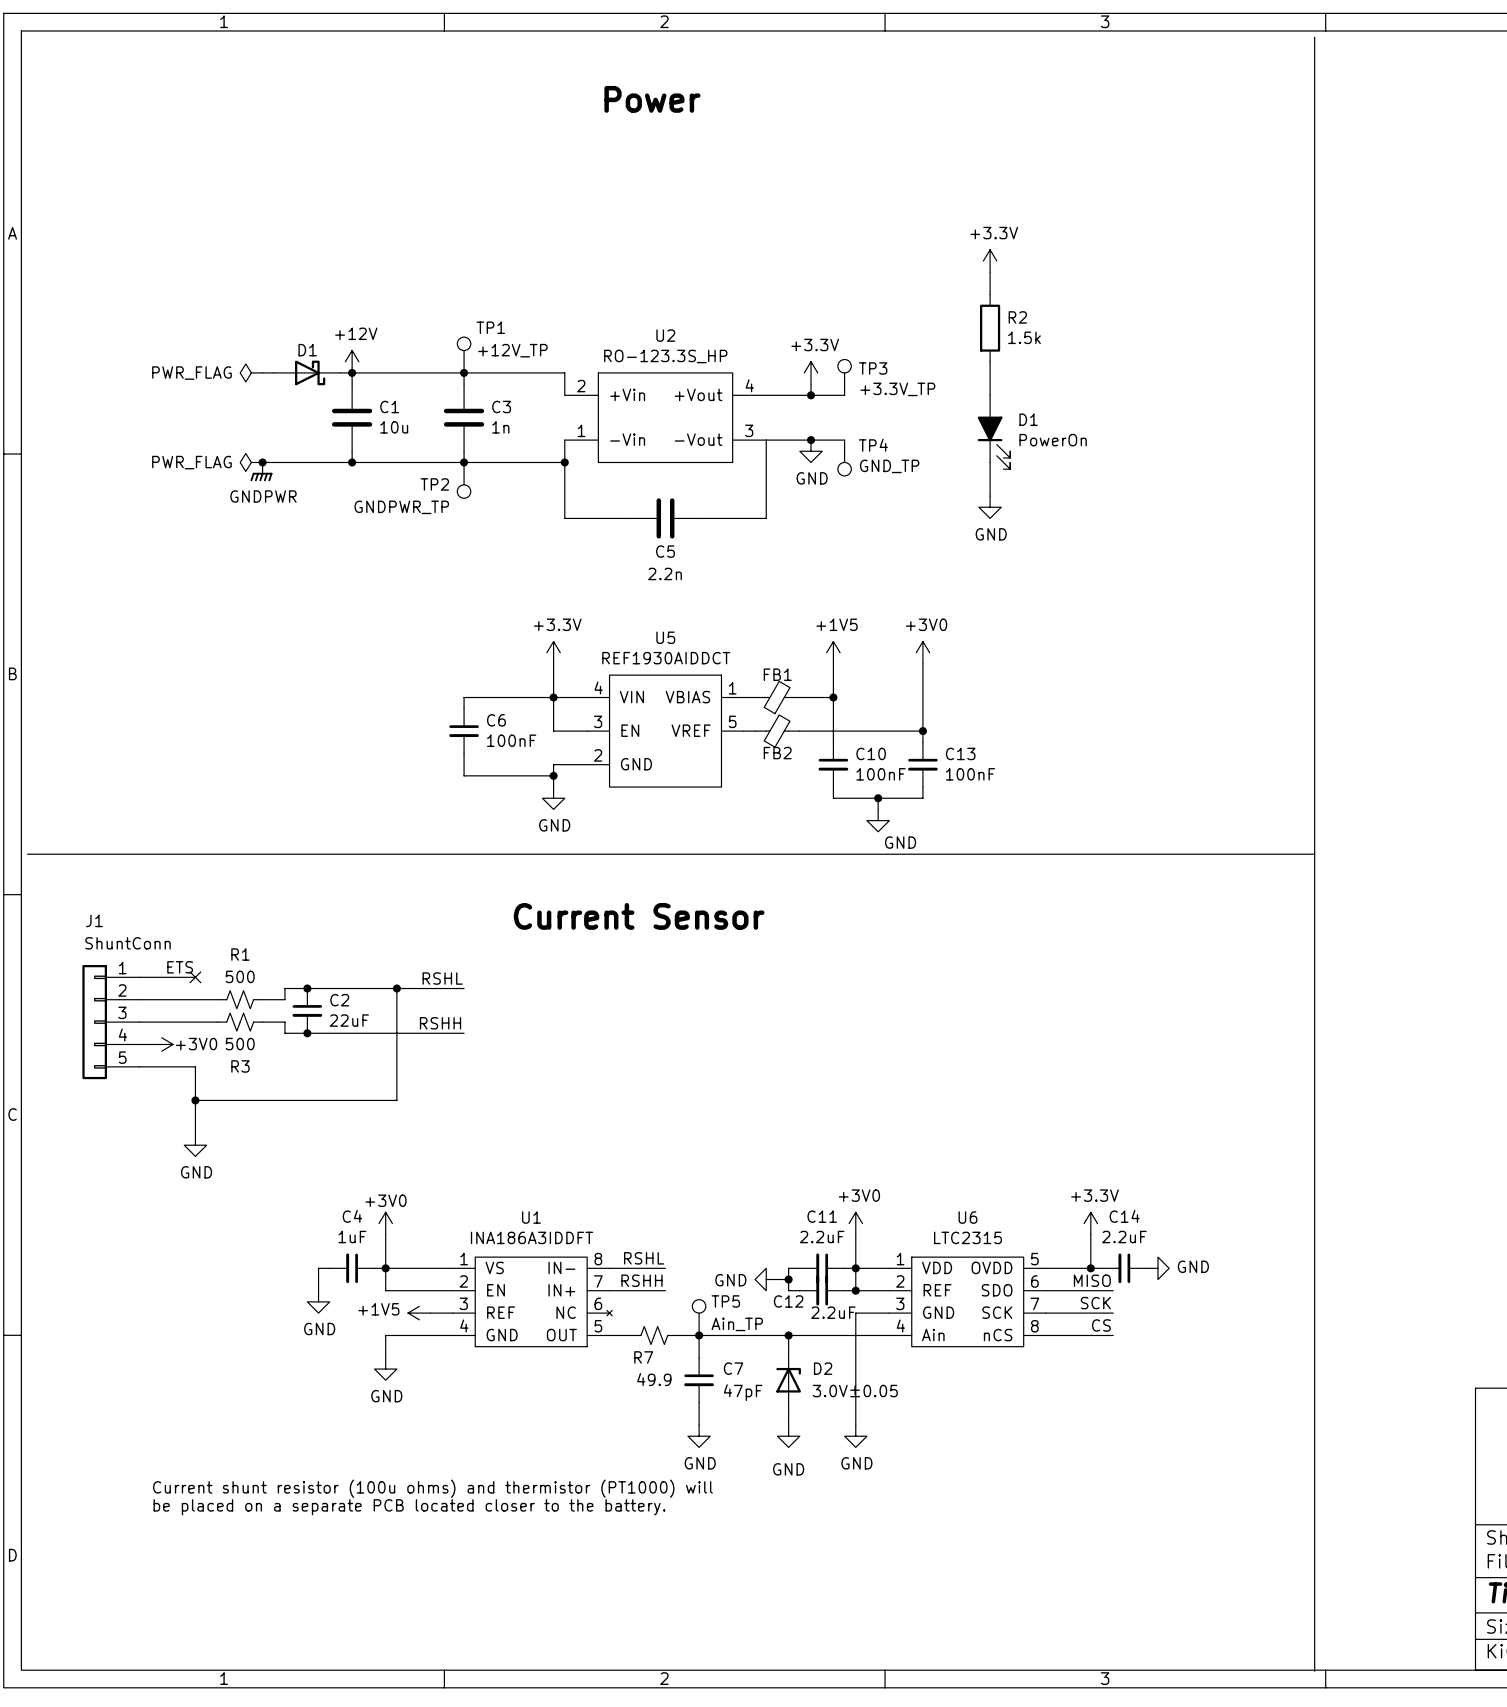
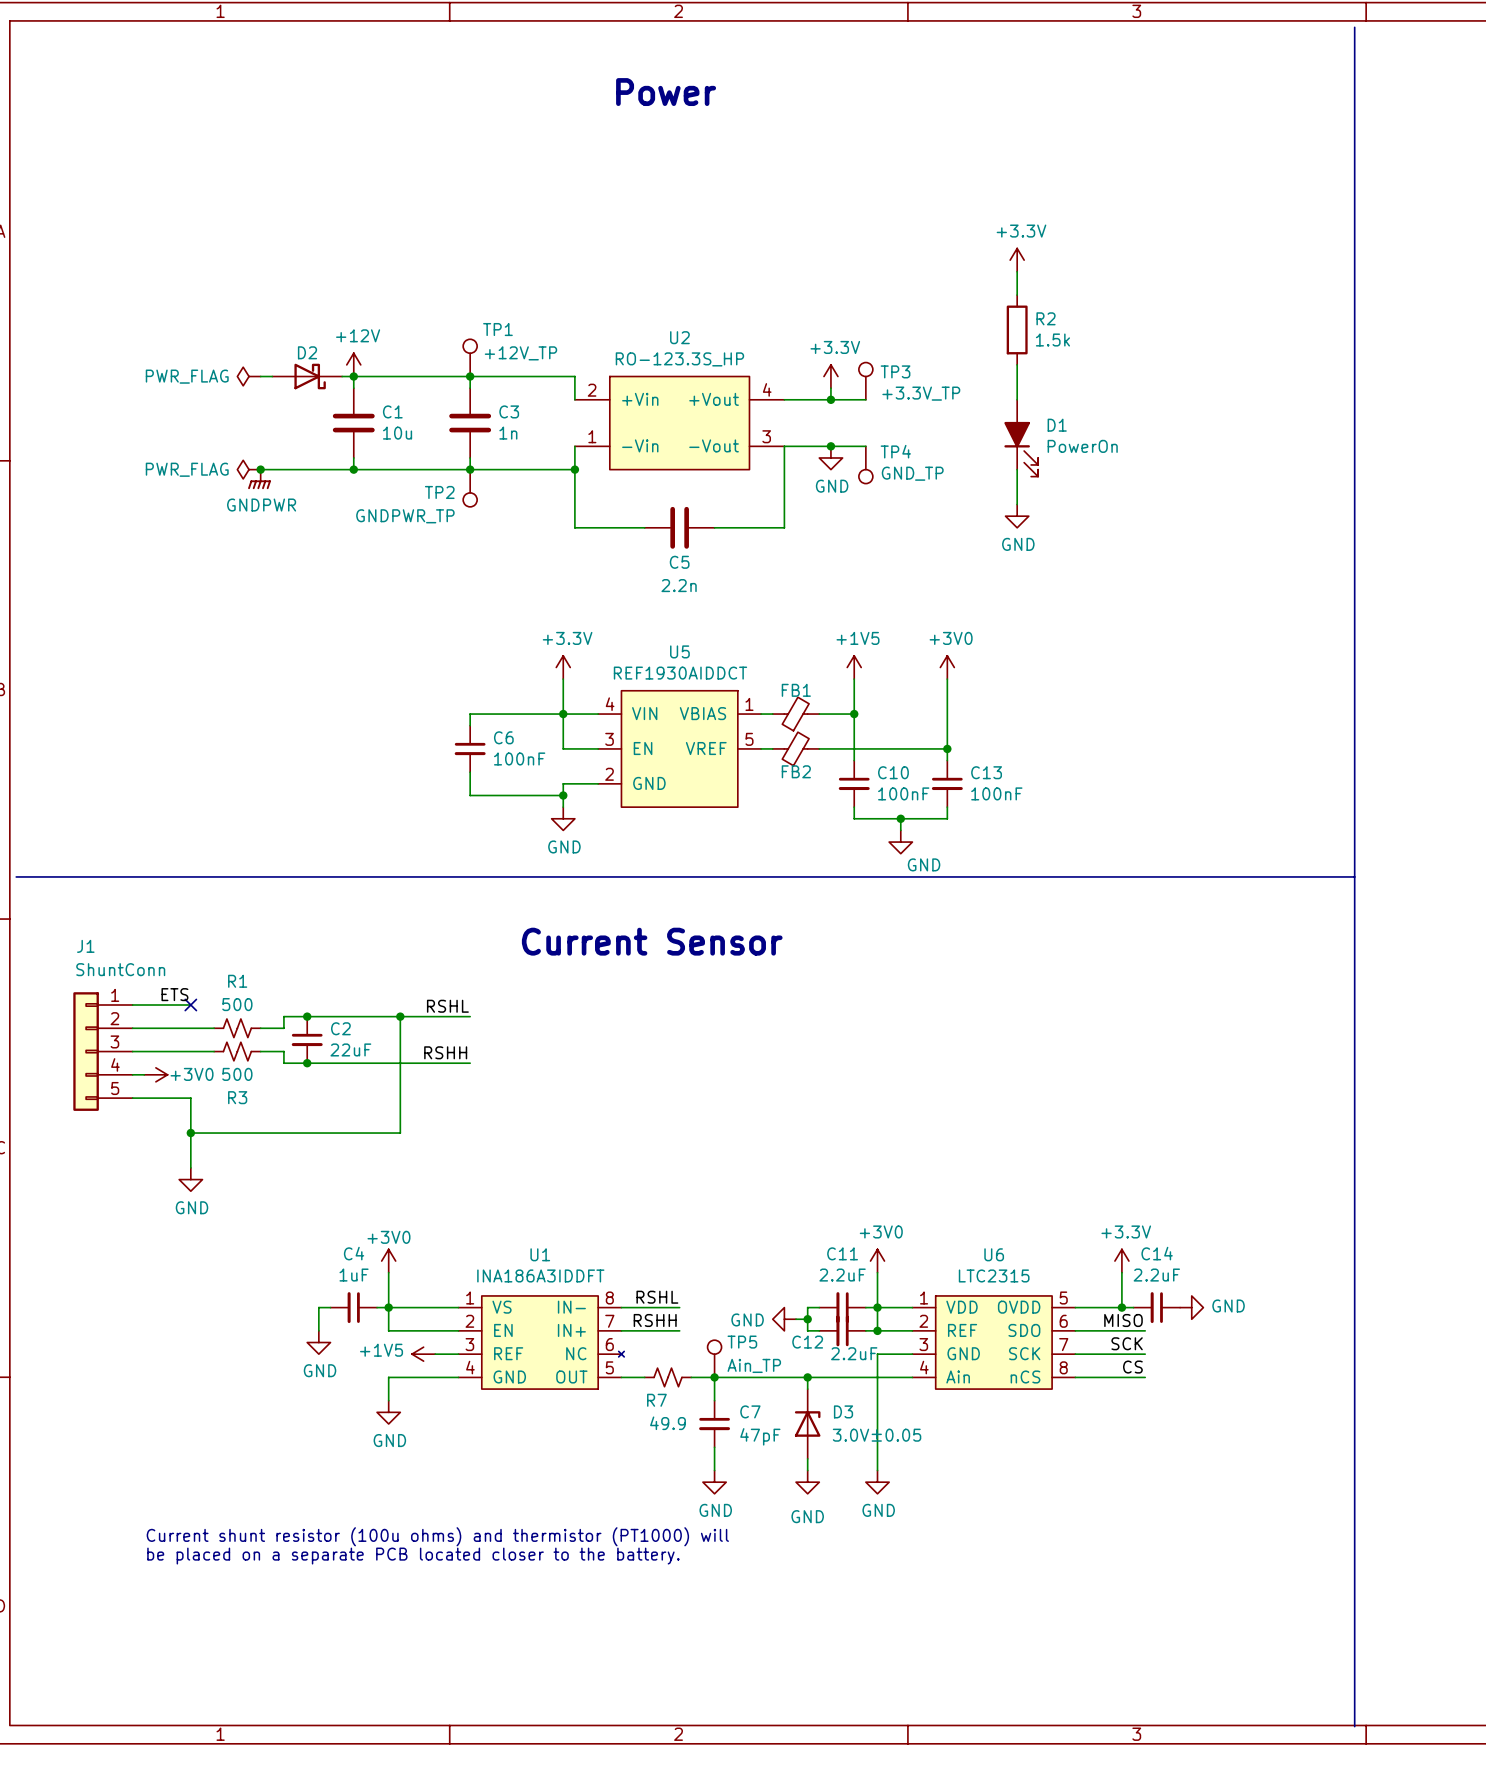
D1 name: D1 (307, 350) -> D2 (307, 352)
D2 name: D2 (823, 1368) -> D3 (843, 1411)

